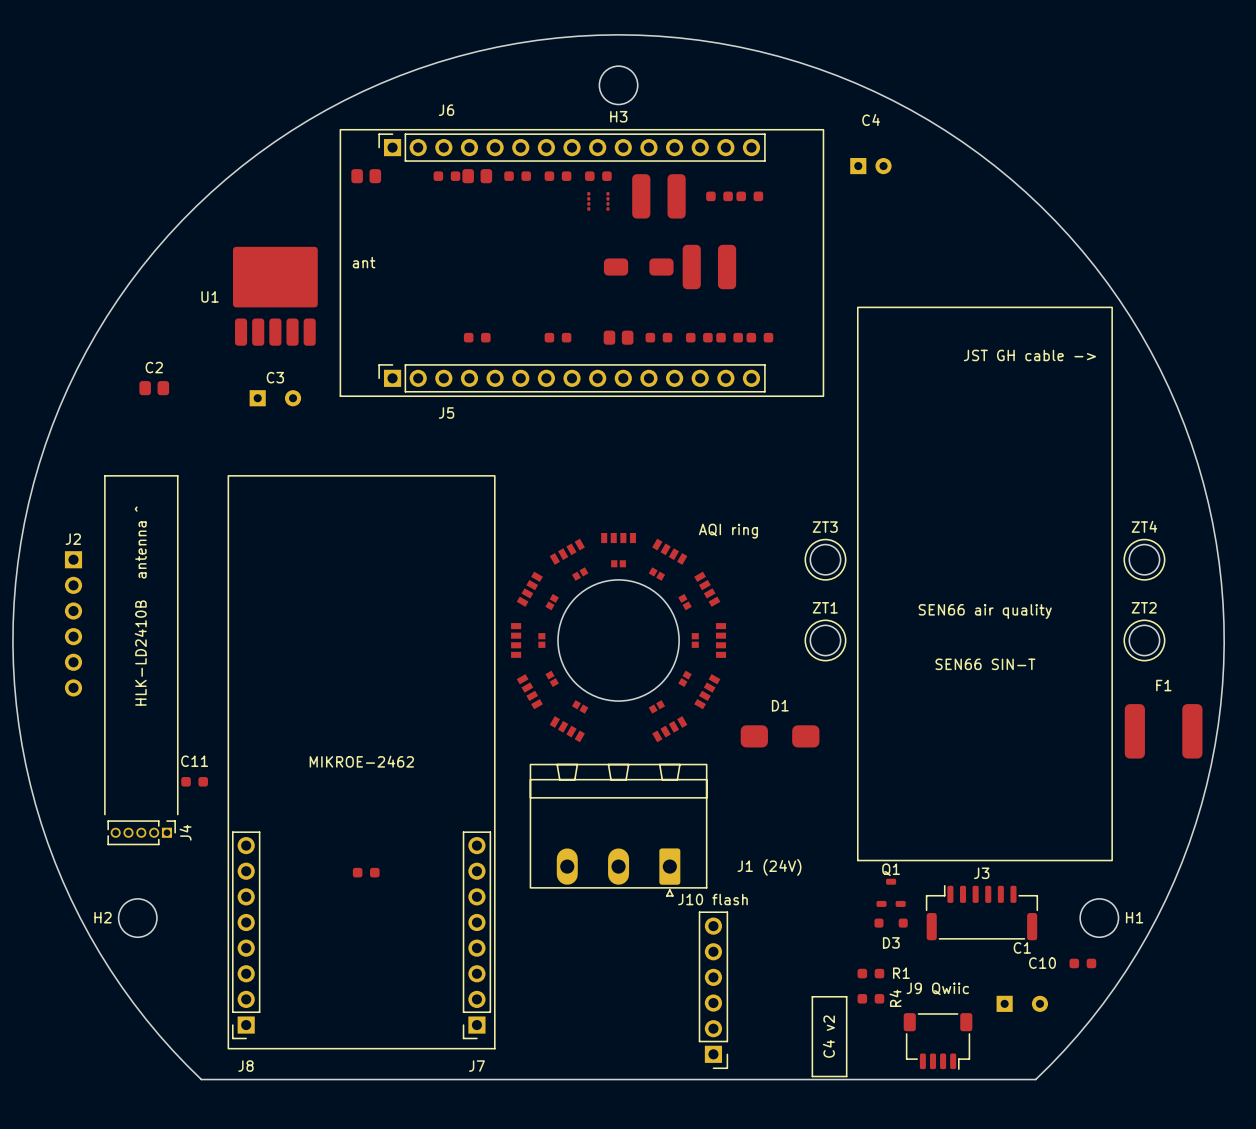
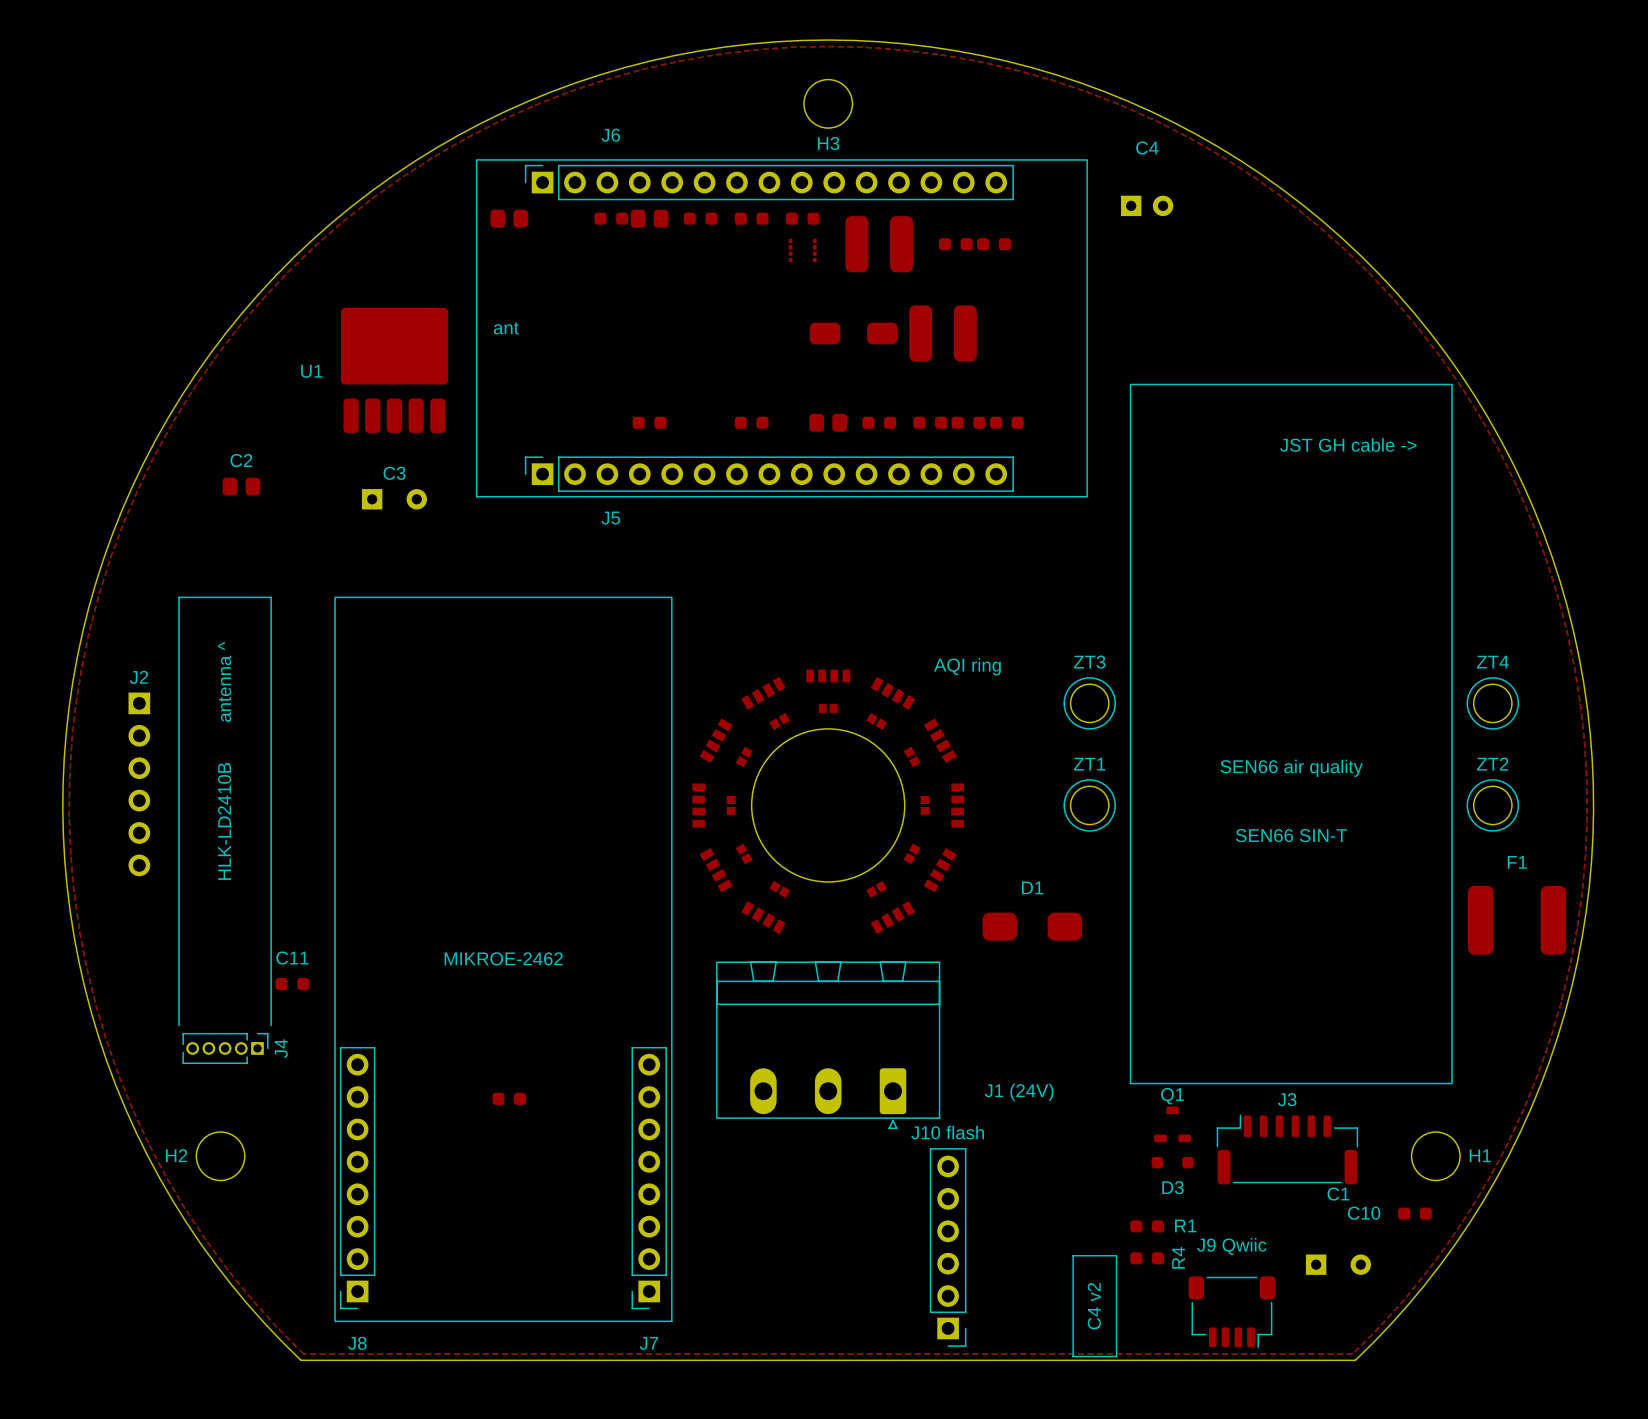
top zone outline: none -> (828, 46) (790, 47) (715, 54) (642, 69) (605, 79) (570, 91) (500, 120) (434, 156) (403, 176) (342, 221) (314, 246) (287, 272) (237, 328) (193, 389) (173, 421) (155, 454) (123, 522) (99, 593) (89, 630) (81, 667) (71, 741) (69, 816) (70, 854) (79, 928) (86, 965) (105, 1038) (118, 1074) (148, 1142) (165, 1176) (205, 1239) (228, 1270) (251, 1299) (303, 1353) (1352, 1353) (1404, 1299) (1450, 1239) (1490, 1176) (1508, 1142) (1538, 1074) (1561, 1002) (1577, 928) (1585, 854) (1587, 816) (1584, 741) (1574, 667) (1557, 593) (1545, 558) (1517, 488) (1501, 454) (1463, 389) (1418, 328) (1368, 272) (1341, 246) (1313, 221) (1253, 176) (1189, 137) (1121, 105) (1086, 91) (1014, 69) (940, 54) (865, 47) (828, 46)

